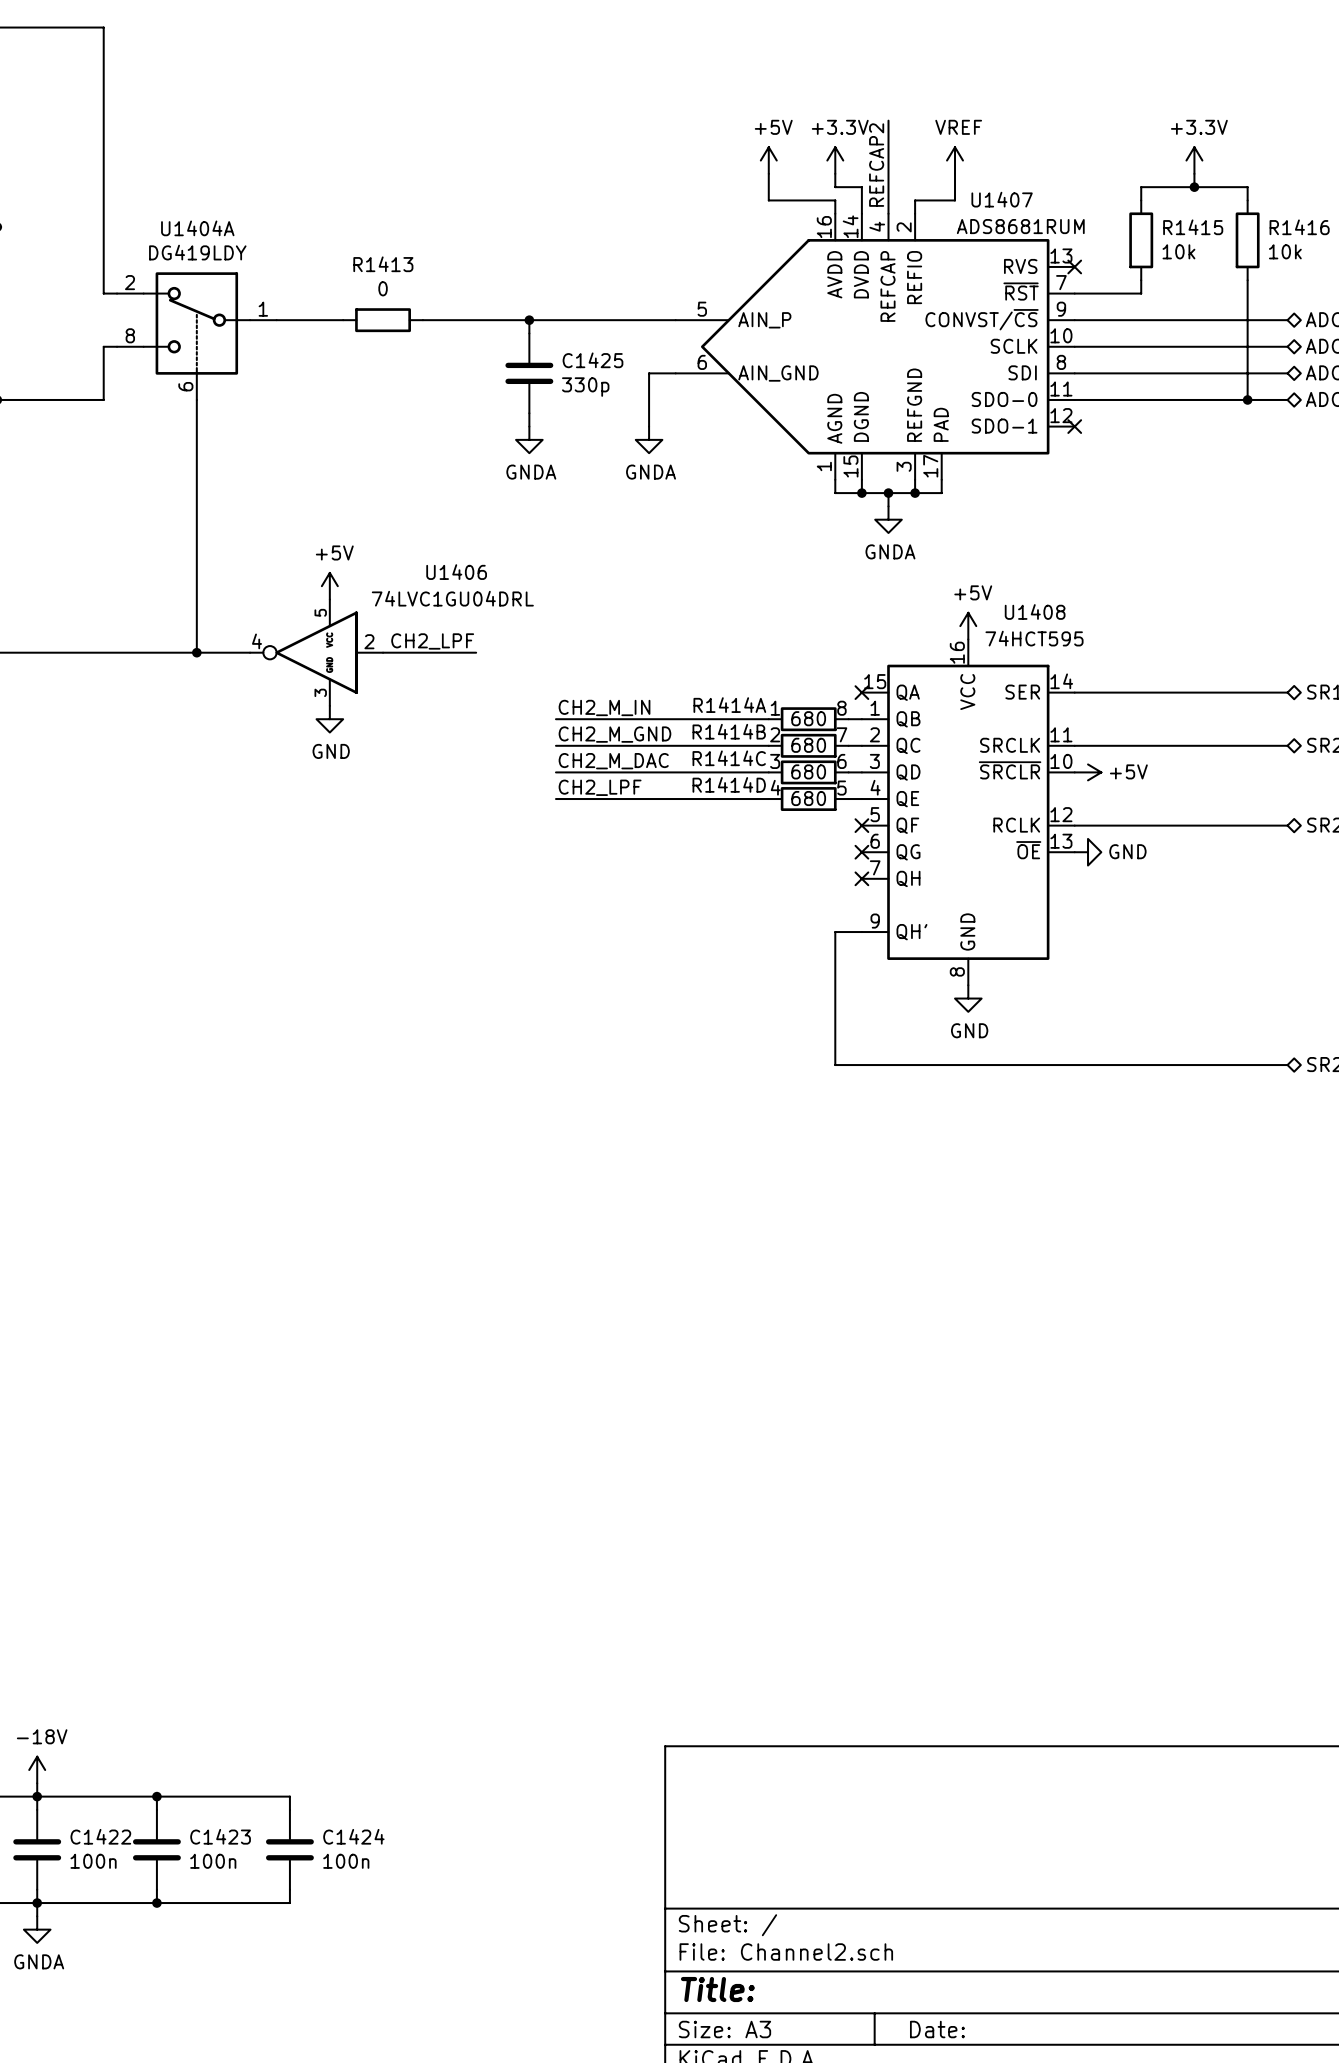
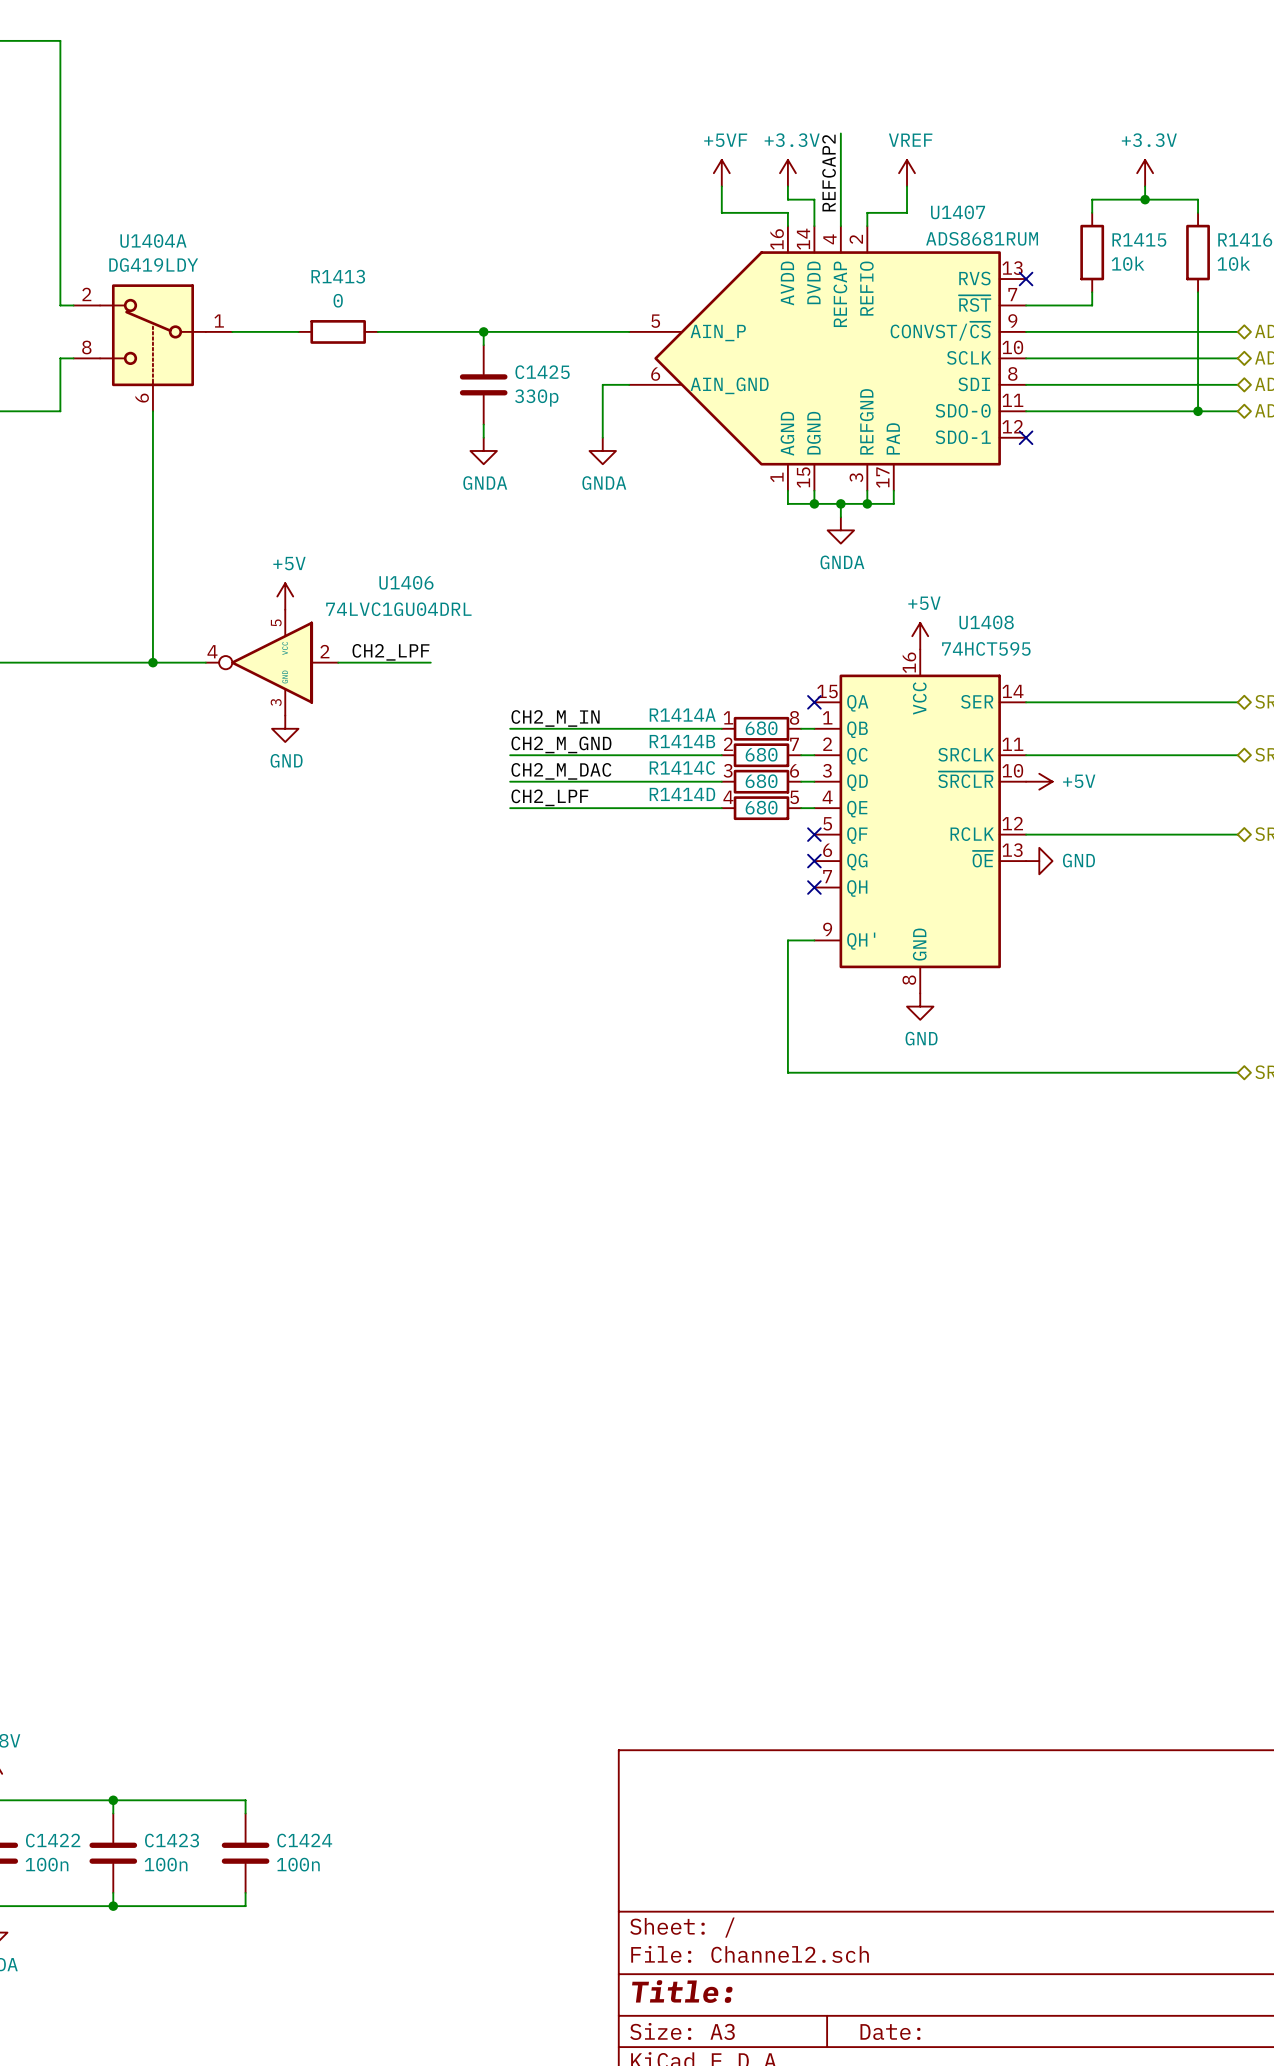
power symbol: +5V (768, 160) -> +5VF (721, 173)

